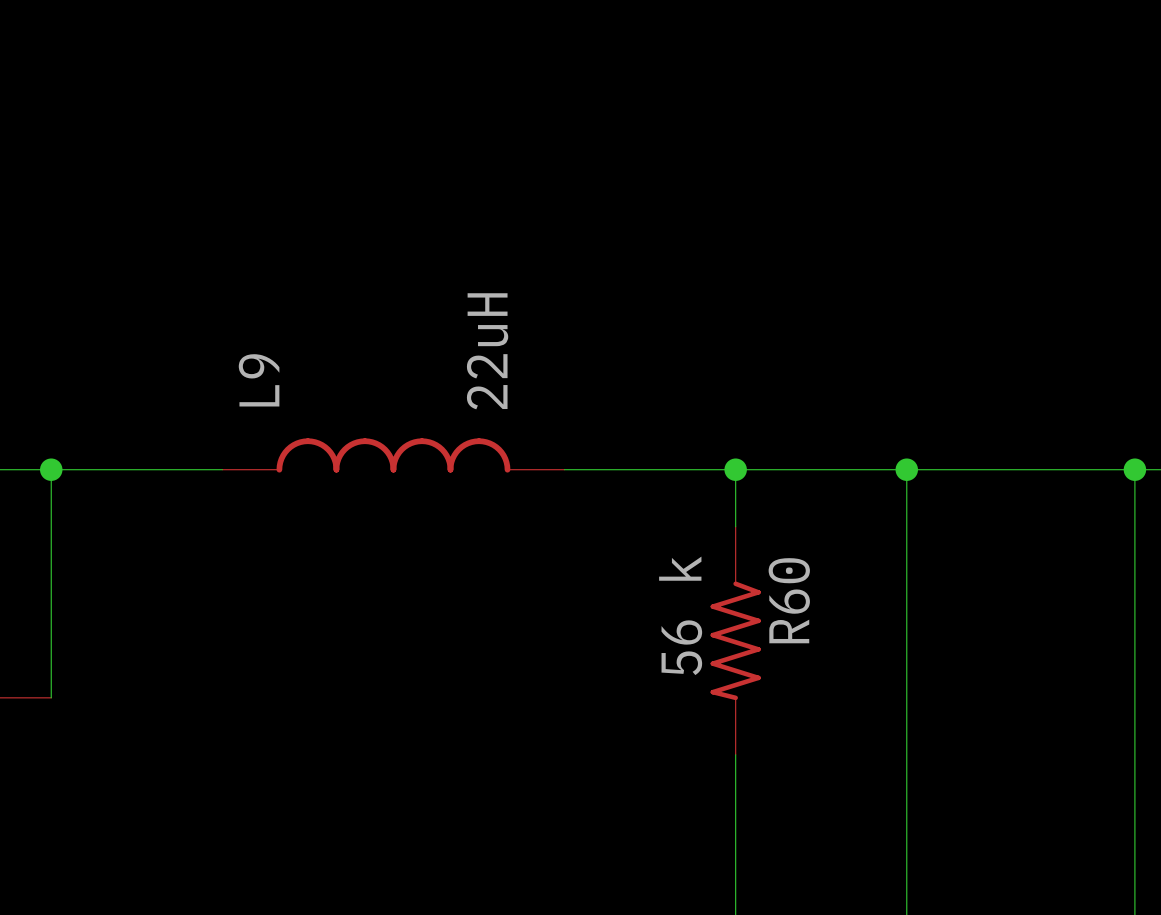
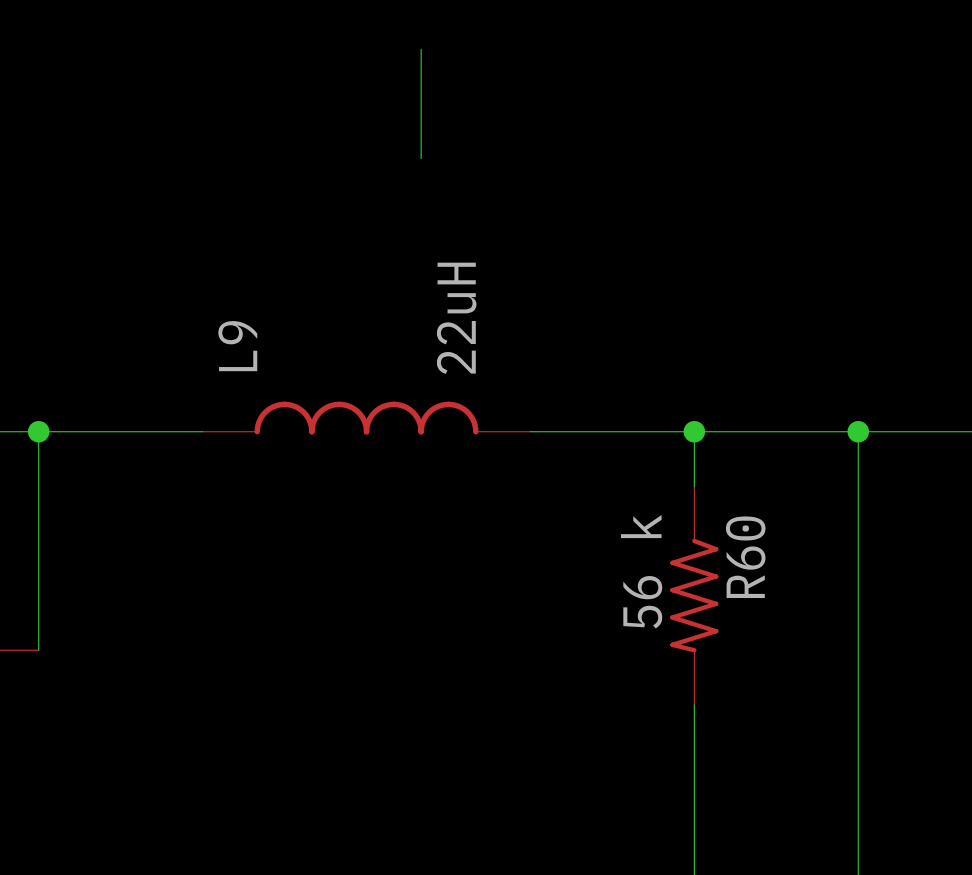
wire: none -> (421, 49) (421, 158)

